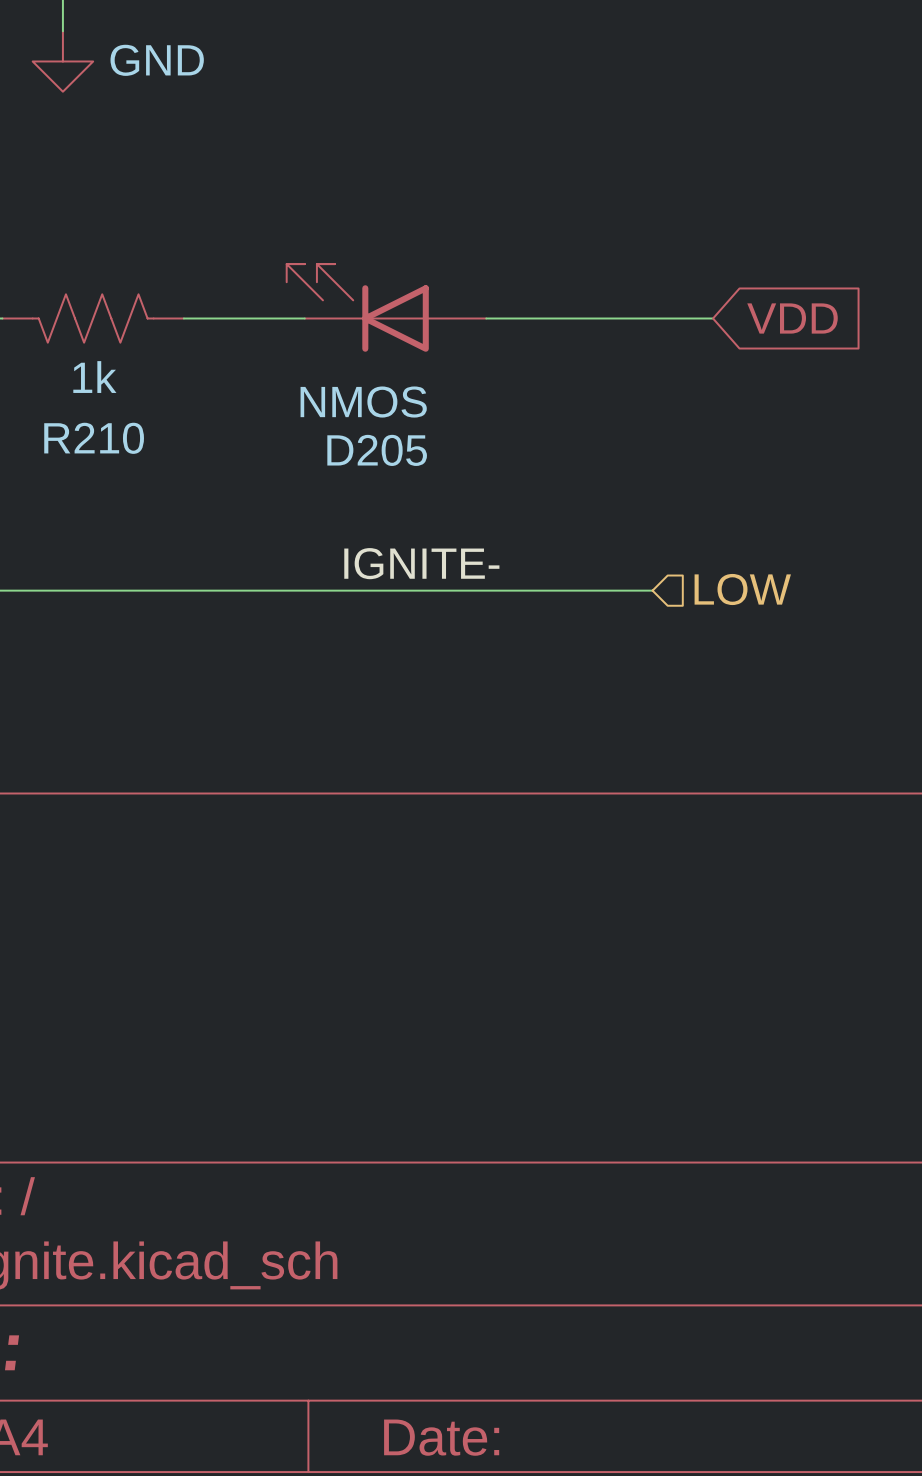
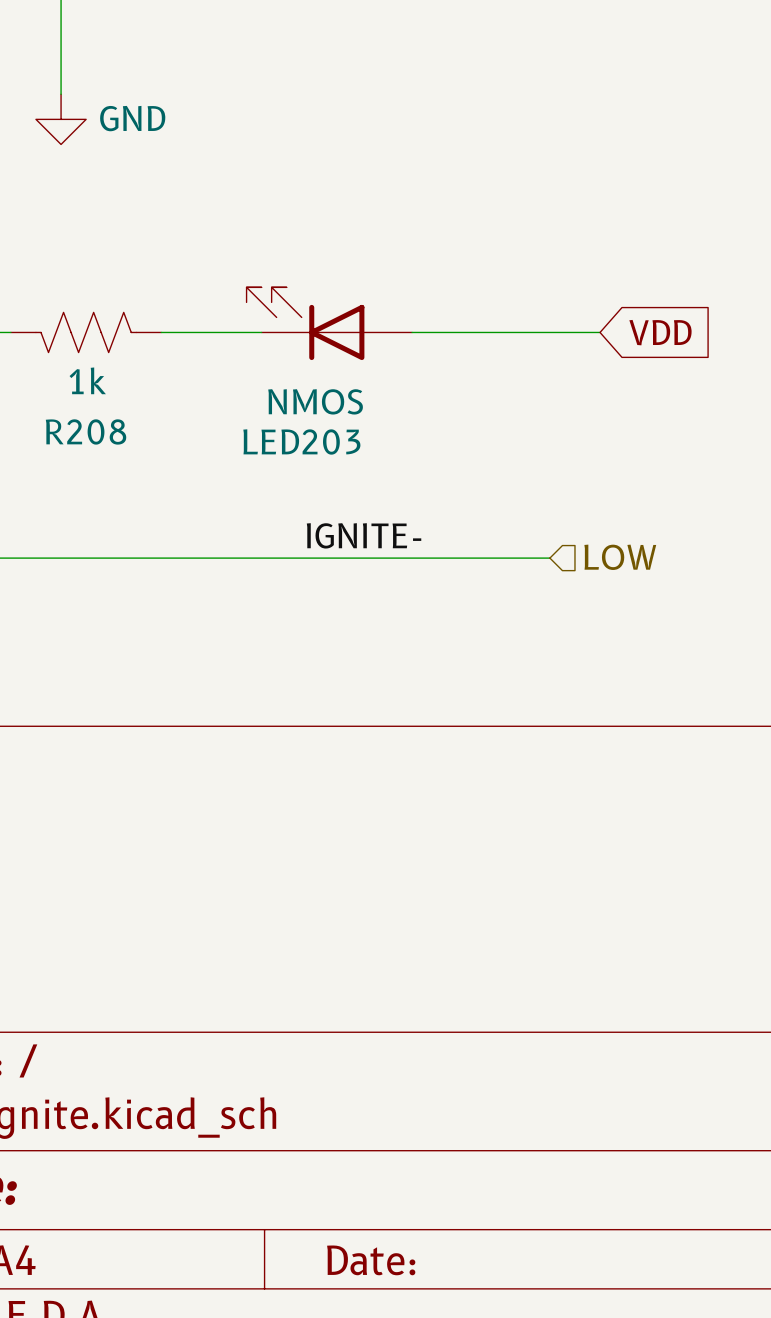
R210 name: R210 (94, 438) -> R208 (86, 431)
D205 name: D205 (377, 450) -> LED203 (301, 441)

